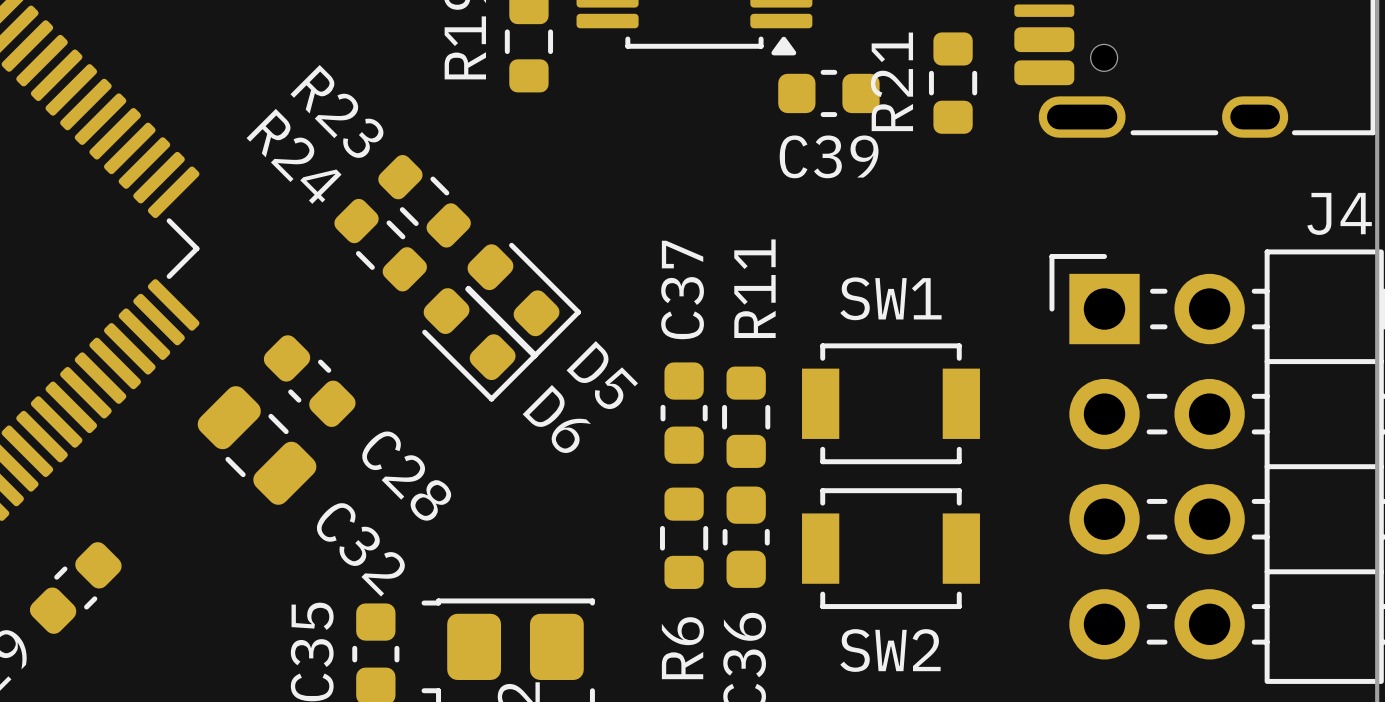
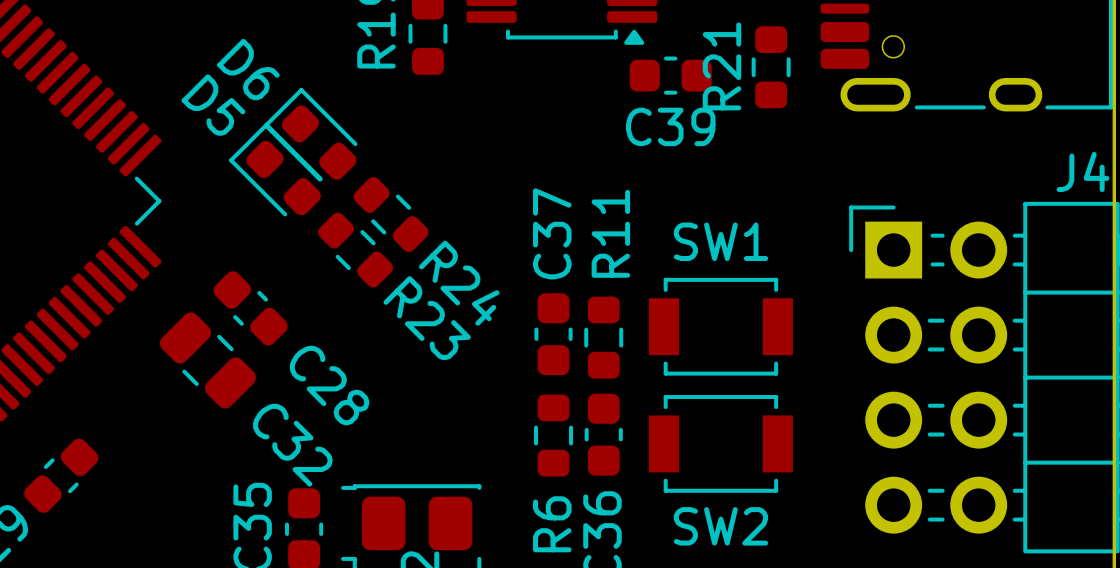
R23 name position: R23 (337, 111) -> R23 (427, 318)
R24 name position: R24 (294, 156) -> R24 (459, 283)
R23 position: (424, 201) -> (355, 250)
R24 position: (380, 245) -> (391, 214)
D5 rotation: 0° (523, 300) -> 180° (275, 169)
D5 position: (523, 300) -> (275, 169)
D6 rotation: 0° (479, 344) -> 180° (311, 134)
D6 position: (479, 344) -> (311, 134)

